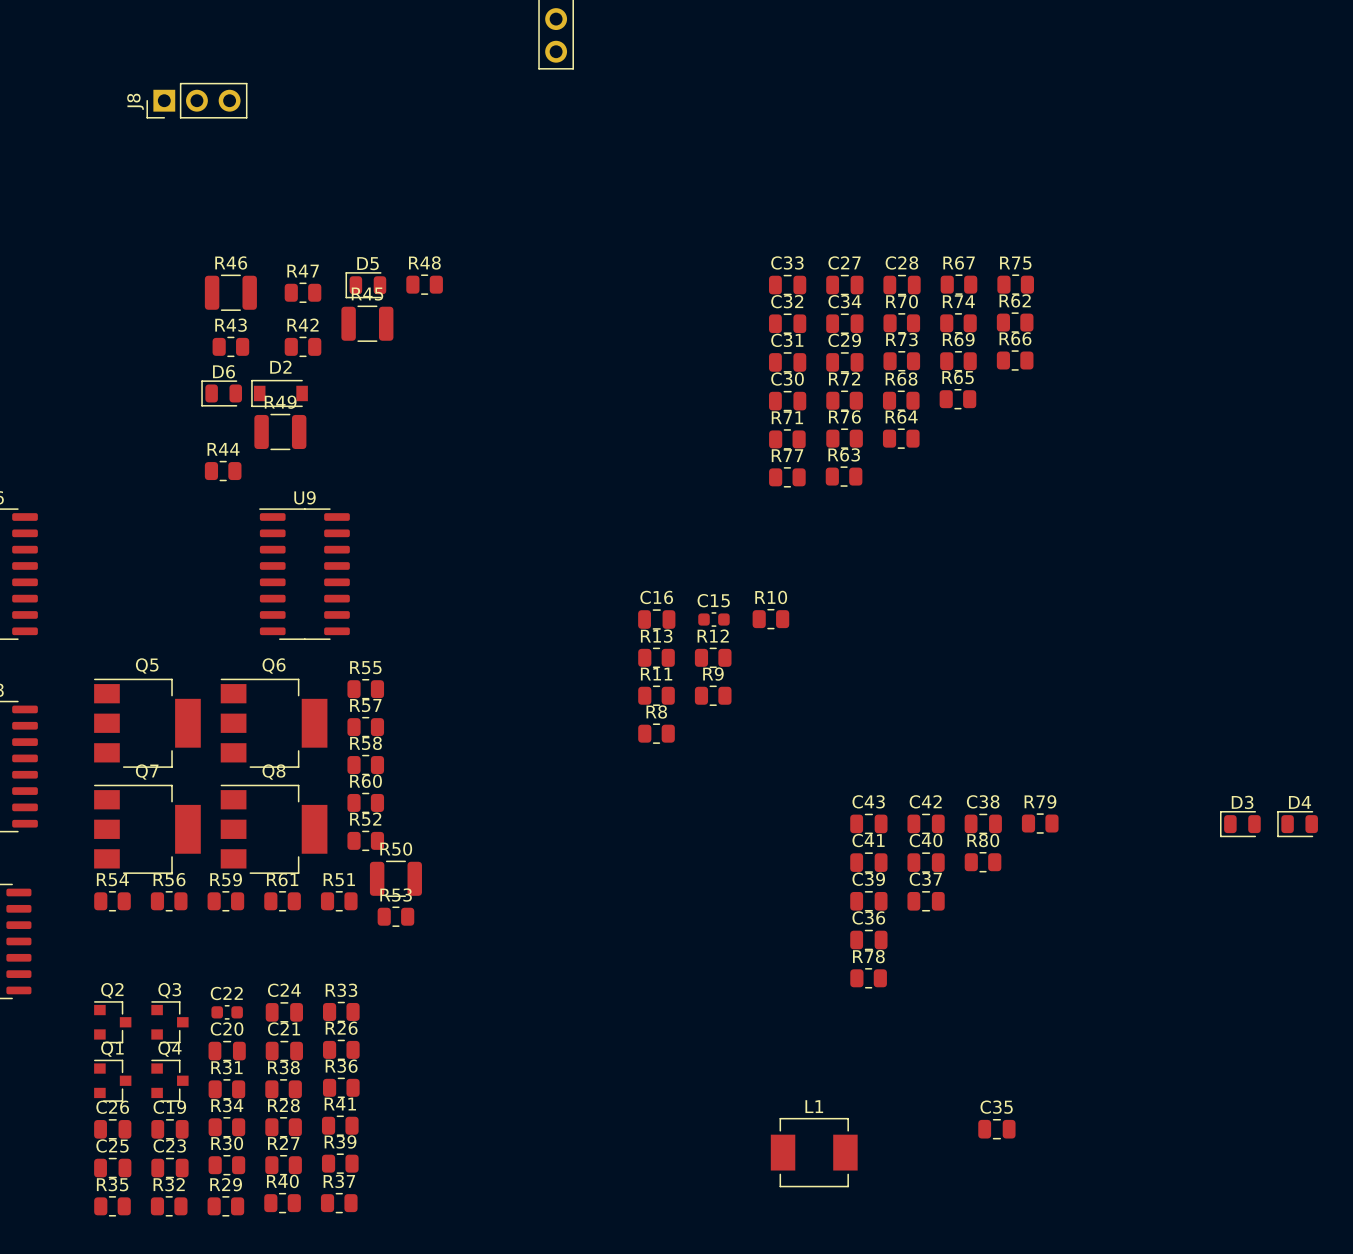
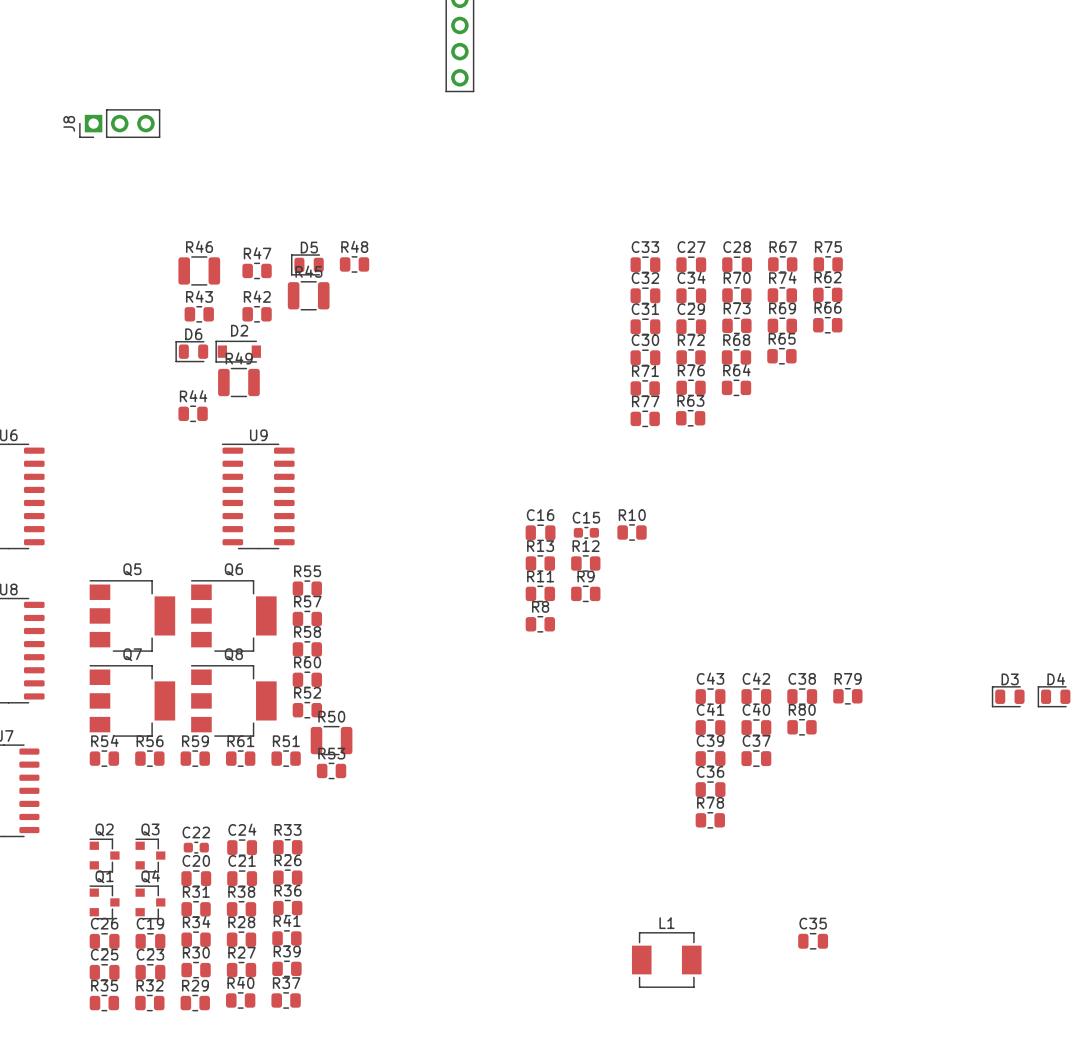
J8 position: (196, 100) -> (119, 123)

